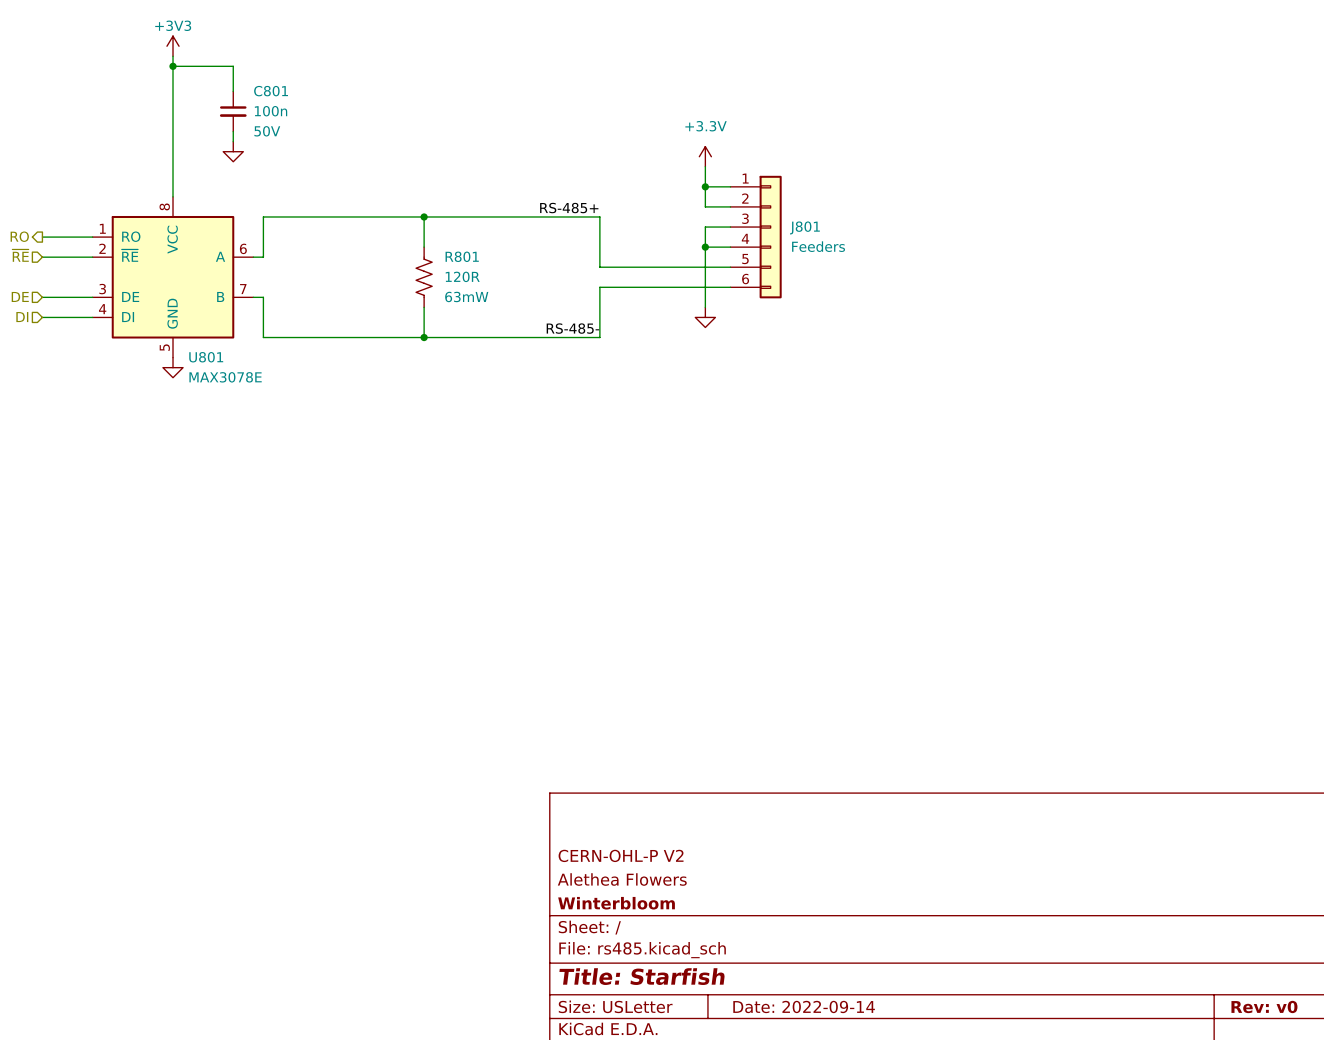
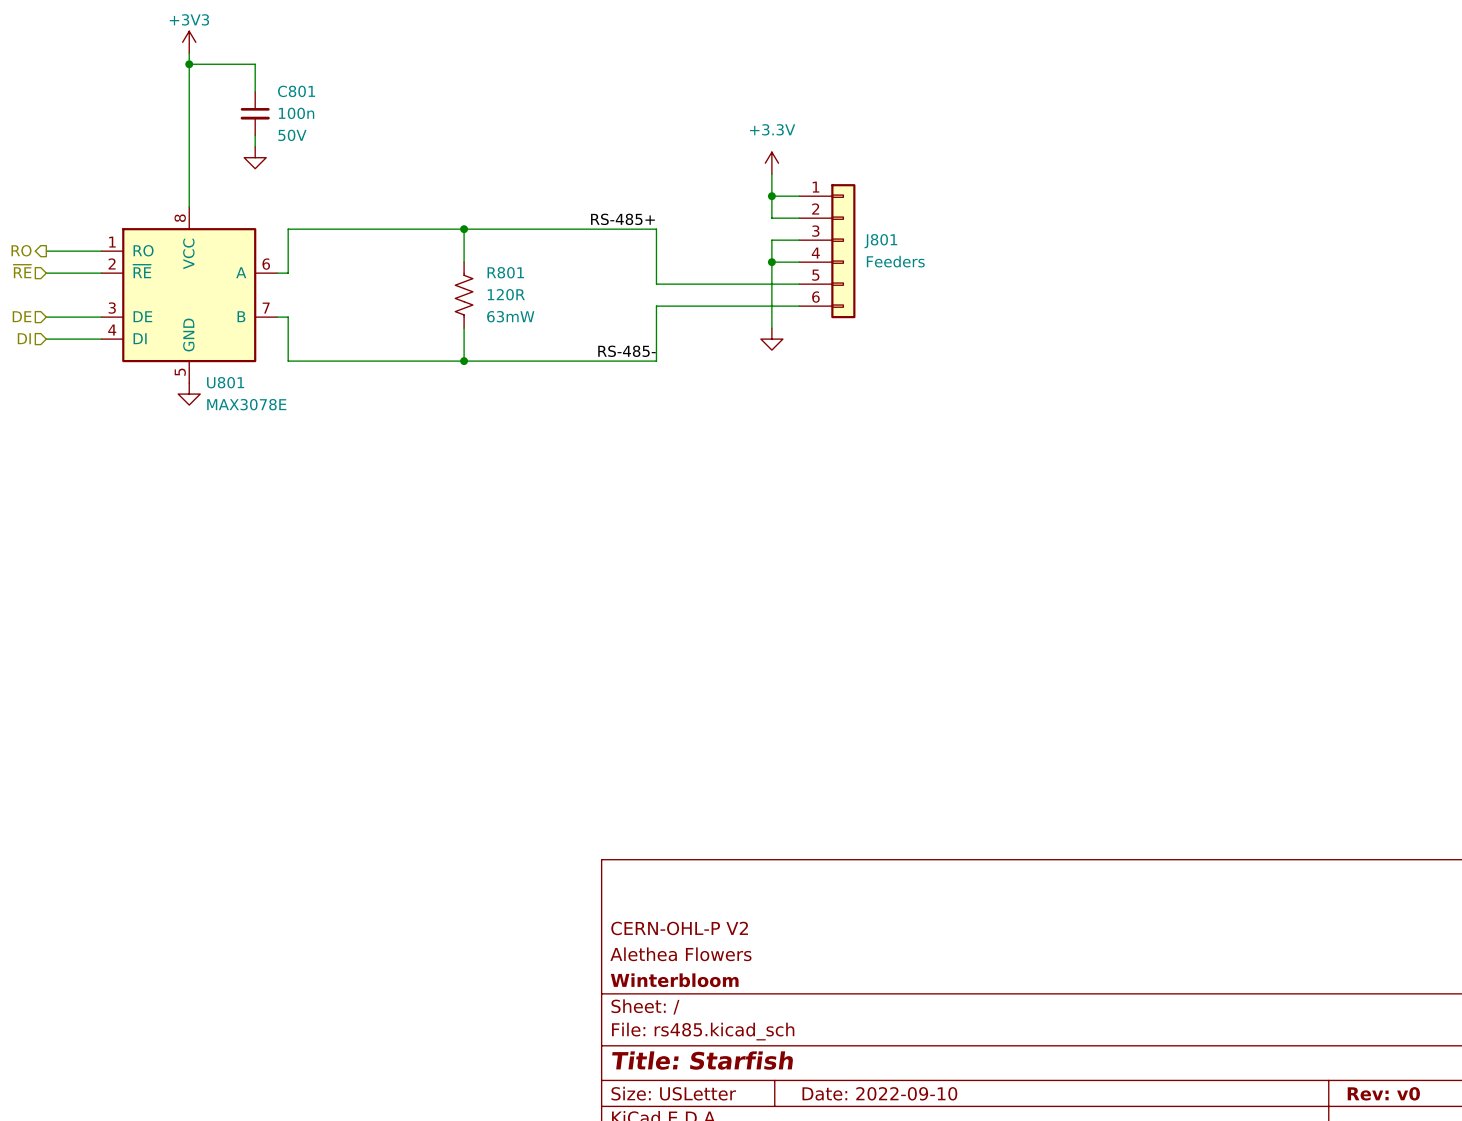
title block: Date: 2022-09-14 (804, 1006) -> Date: 2022-09-10 (879, 1093)

